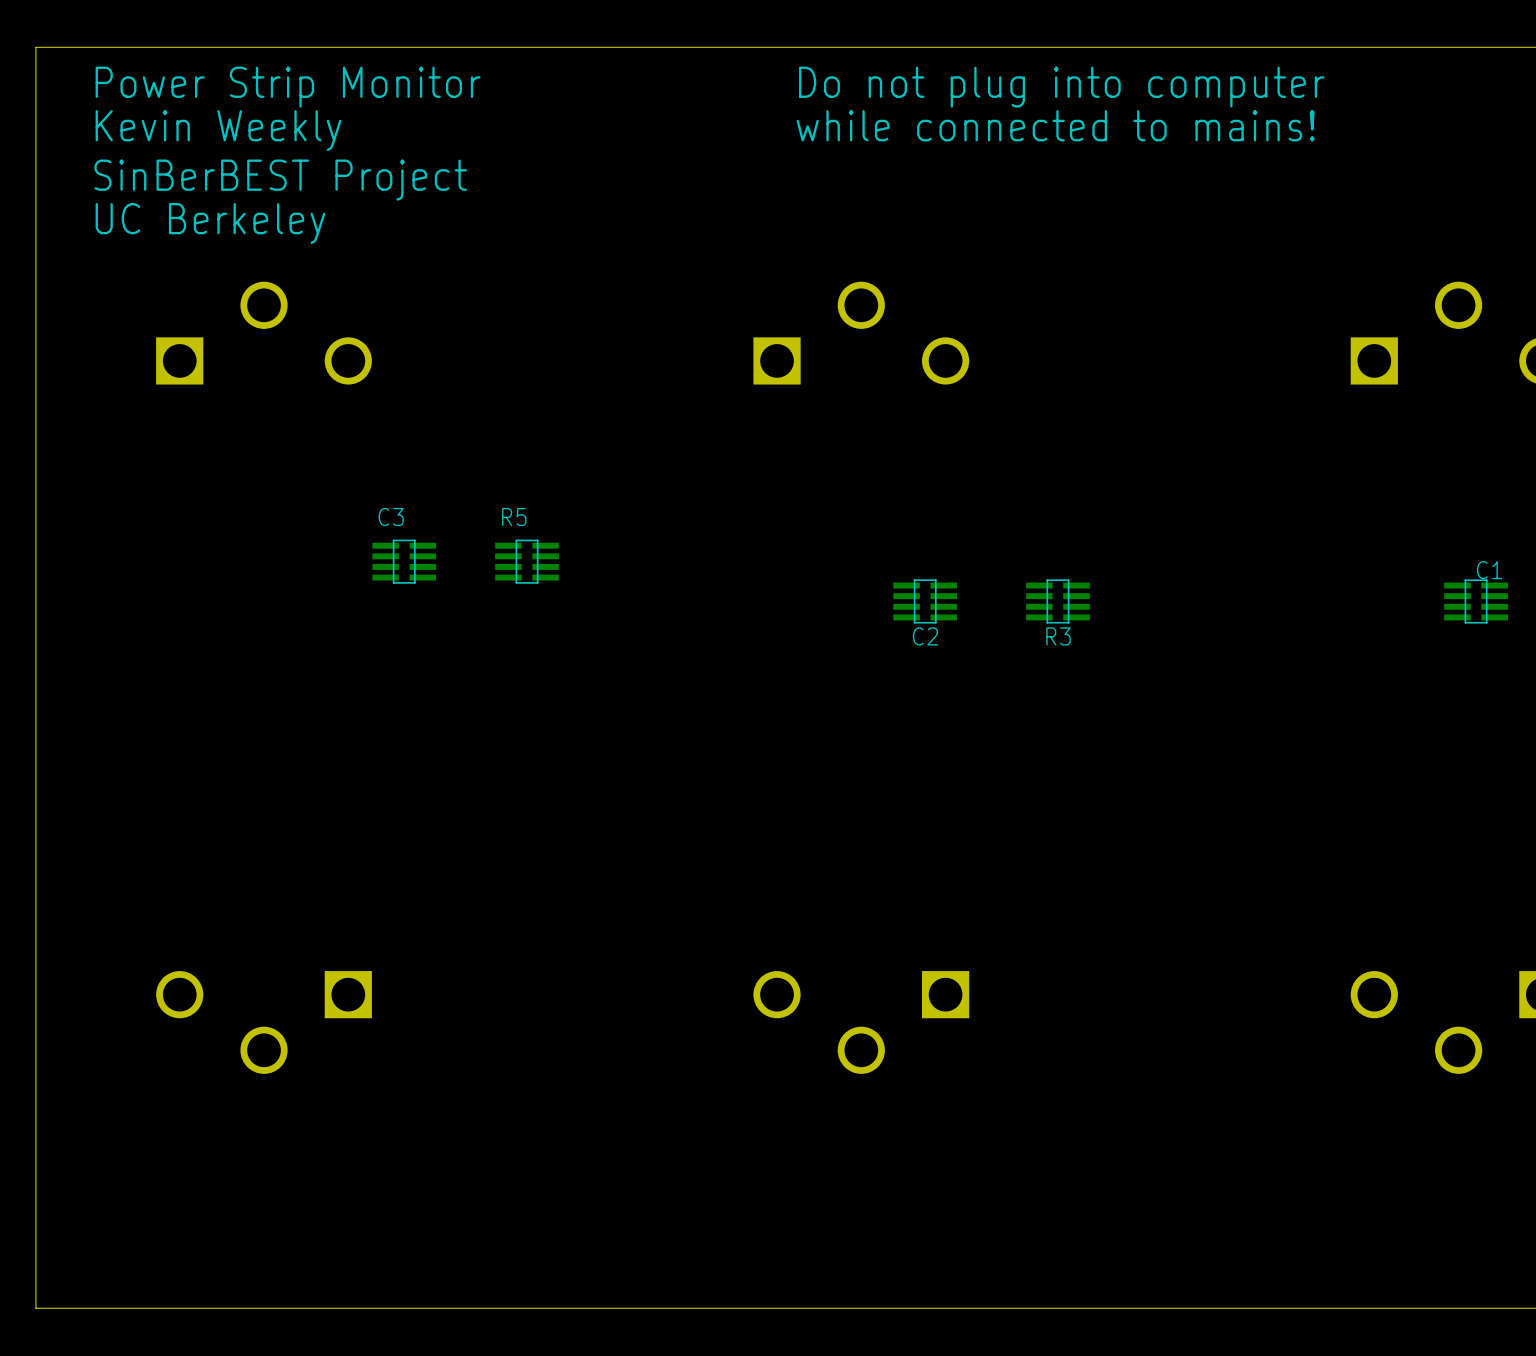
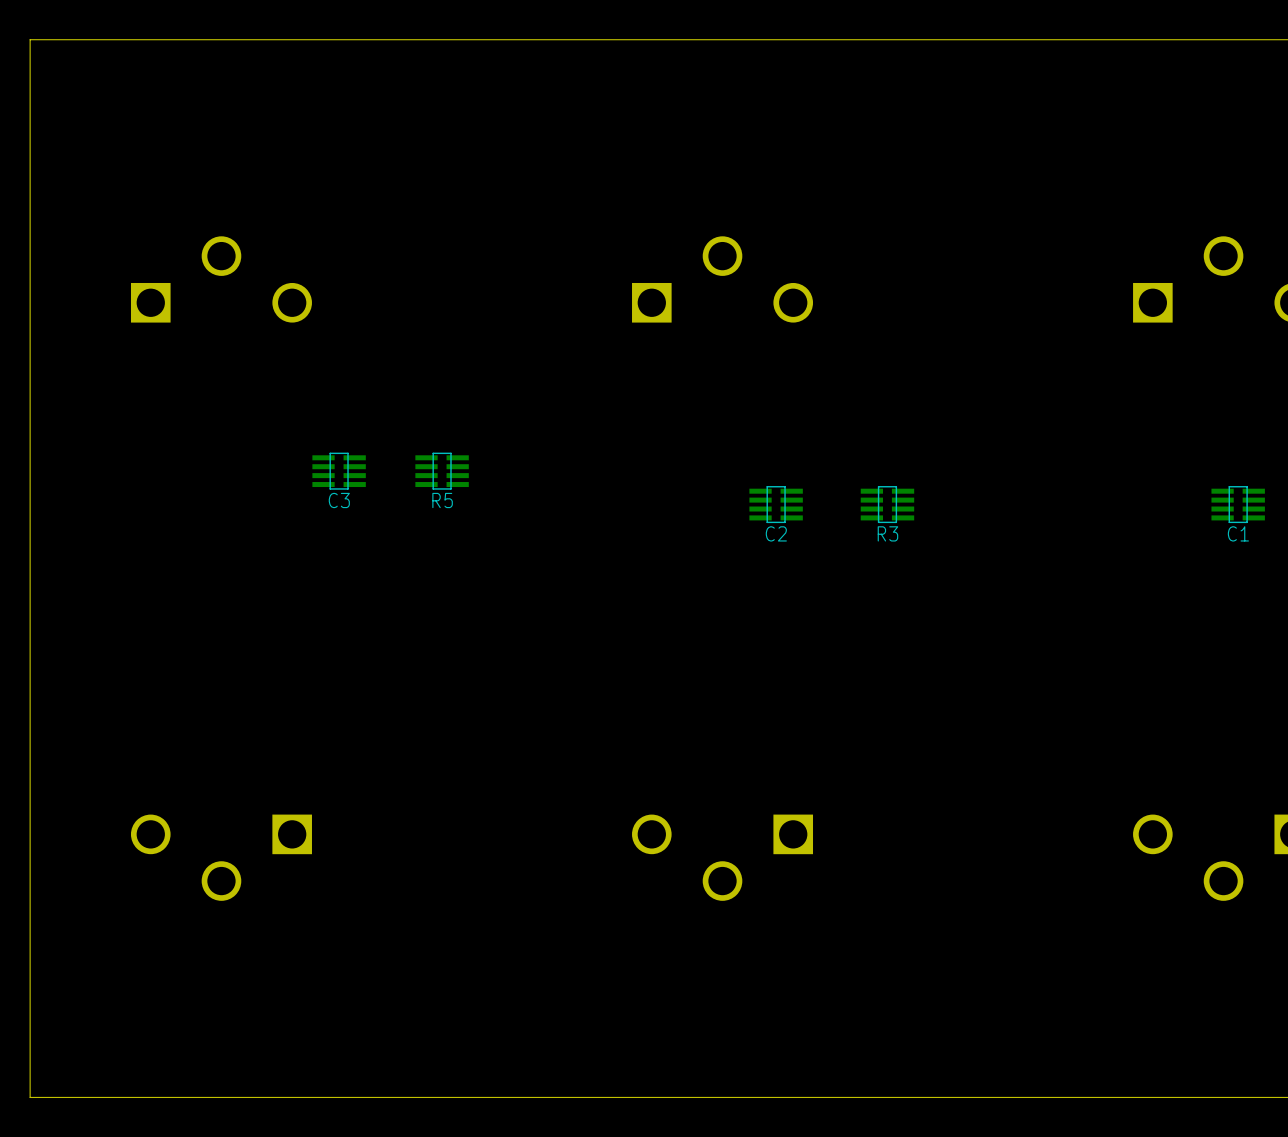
text: Power Strip Monitor (288, 87) -> none
text: Do not plug into computer (1061, 87) -> none
text: while connected to mains! (1055, 125) -> none
text: Kevin Weekly (218, 130) -> none
text: SinBerBEST Project (280, 180) -> none
text: UC Berkeley (210, 223) -> none
C3 name position: C3 (391, 517) -> C3 (339, 500)
R5 name position: R5 (514, 517) -> R5 (442, 500)
C1 name position: C1 (1489, 570) -> C1 (1238, 533)

